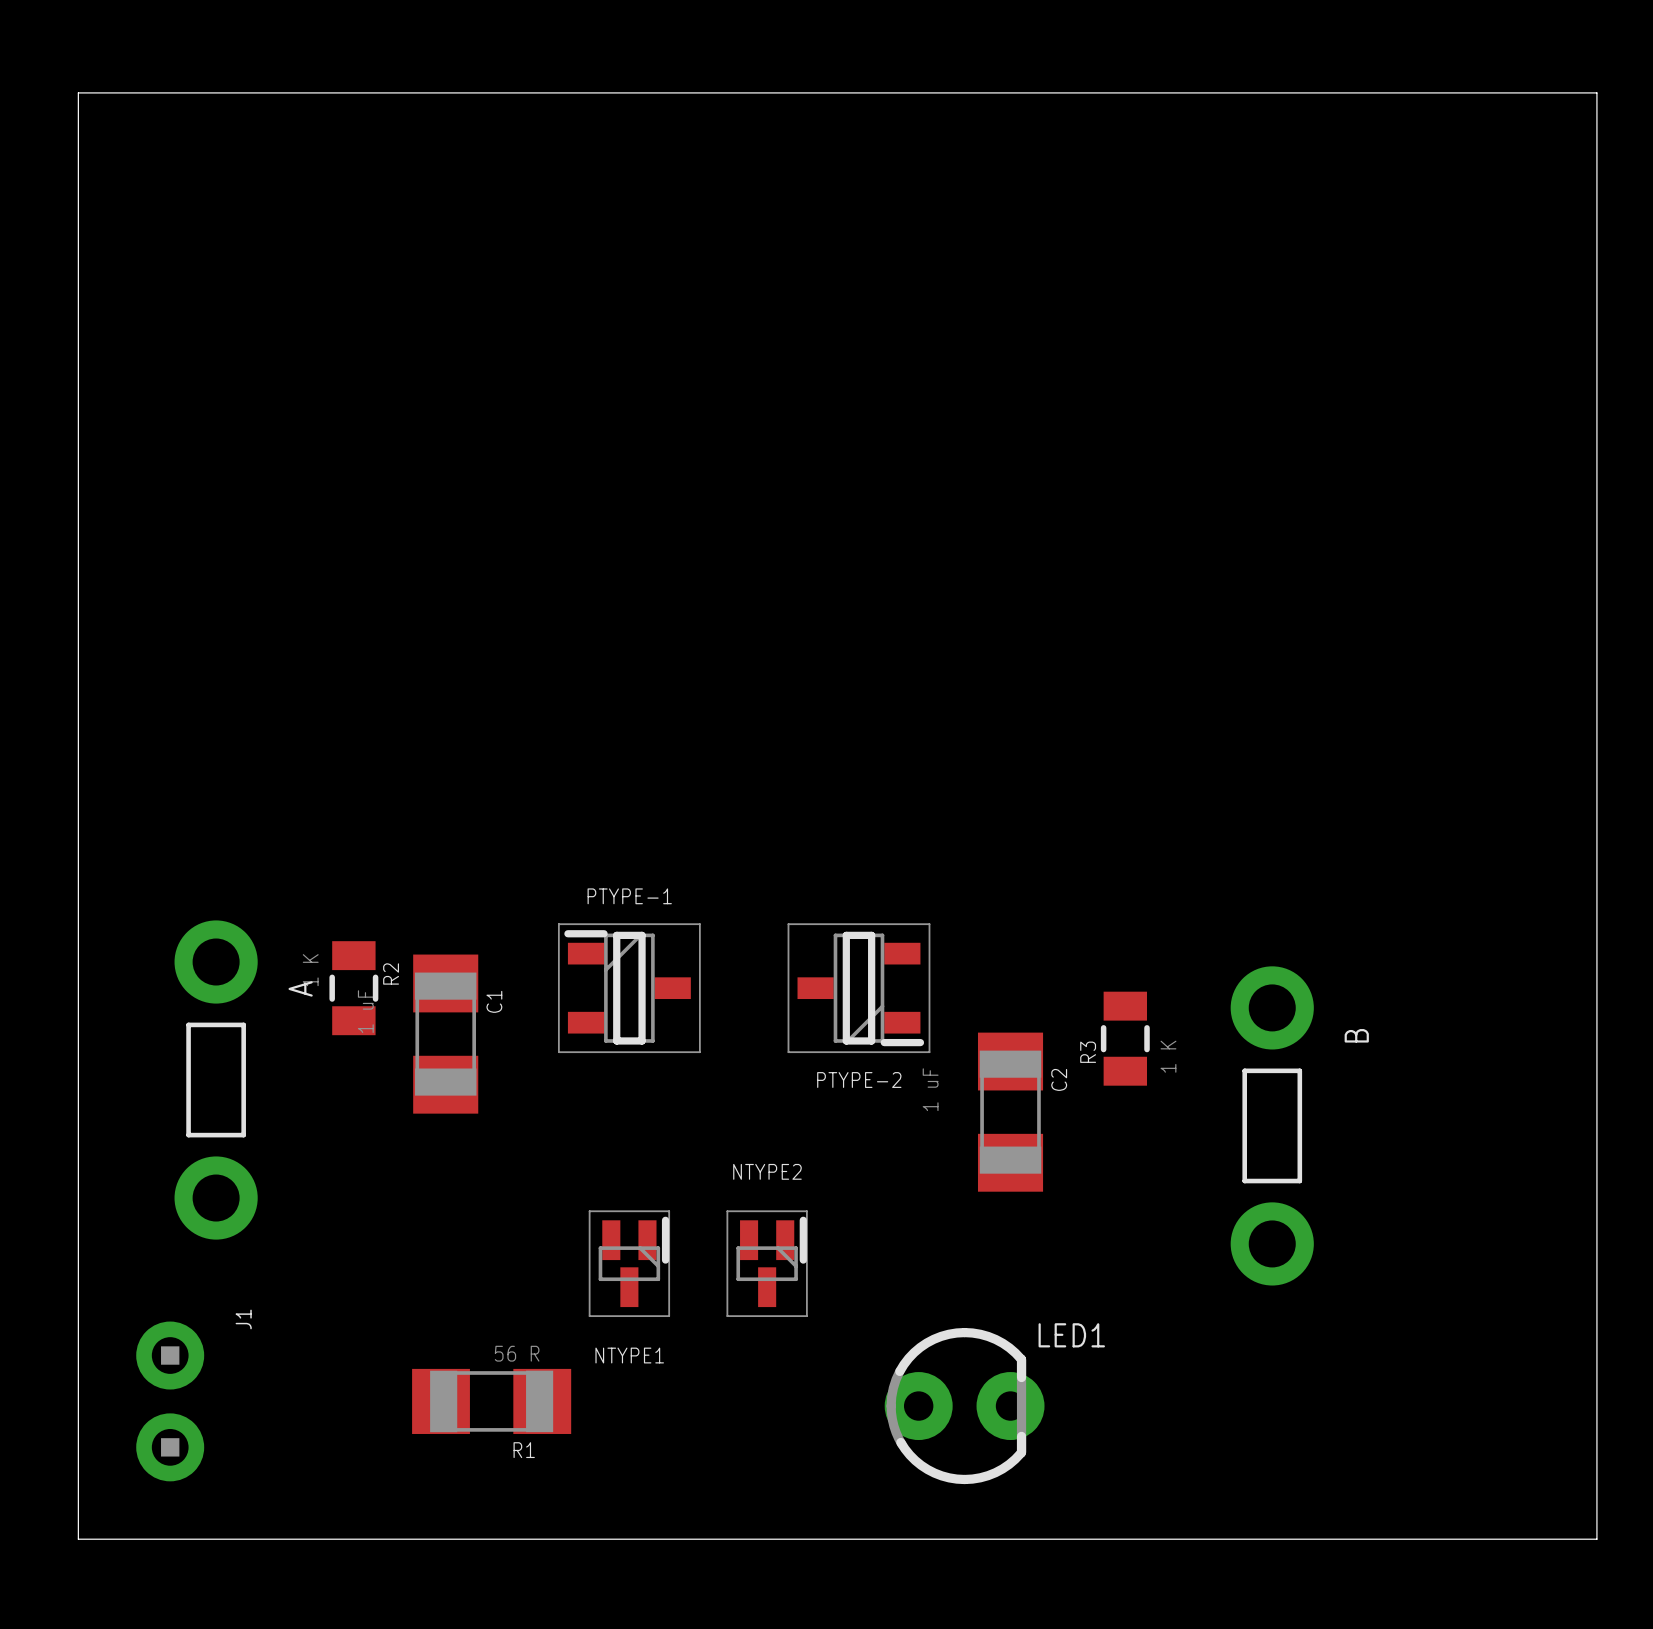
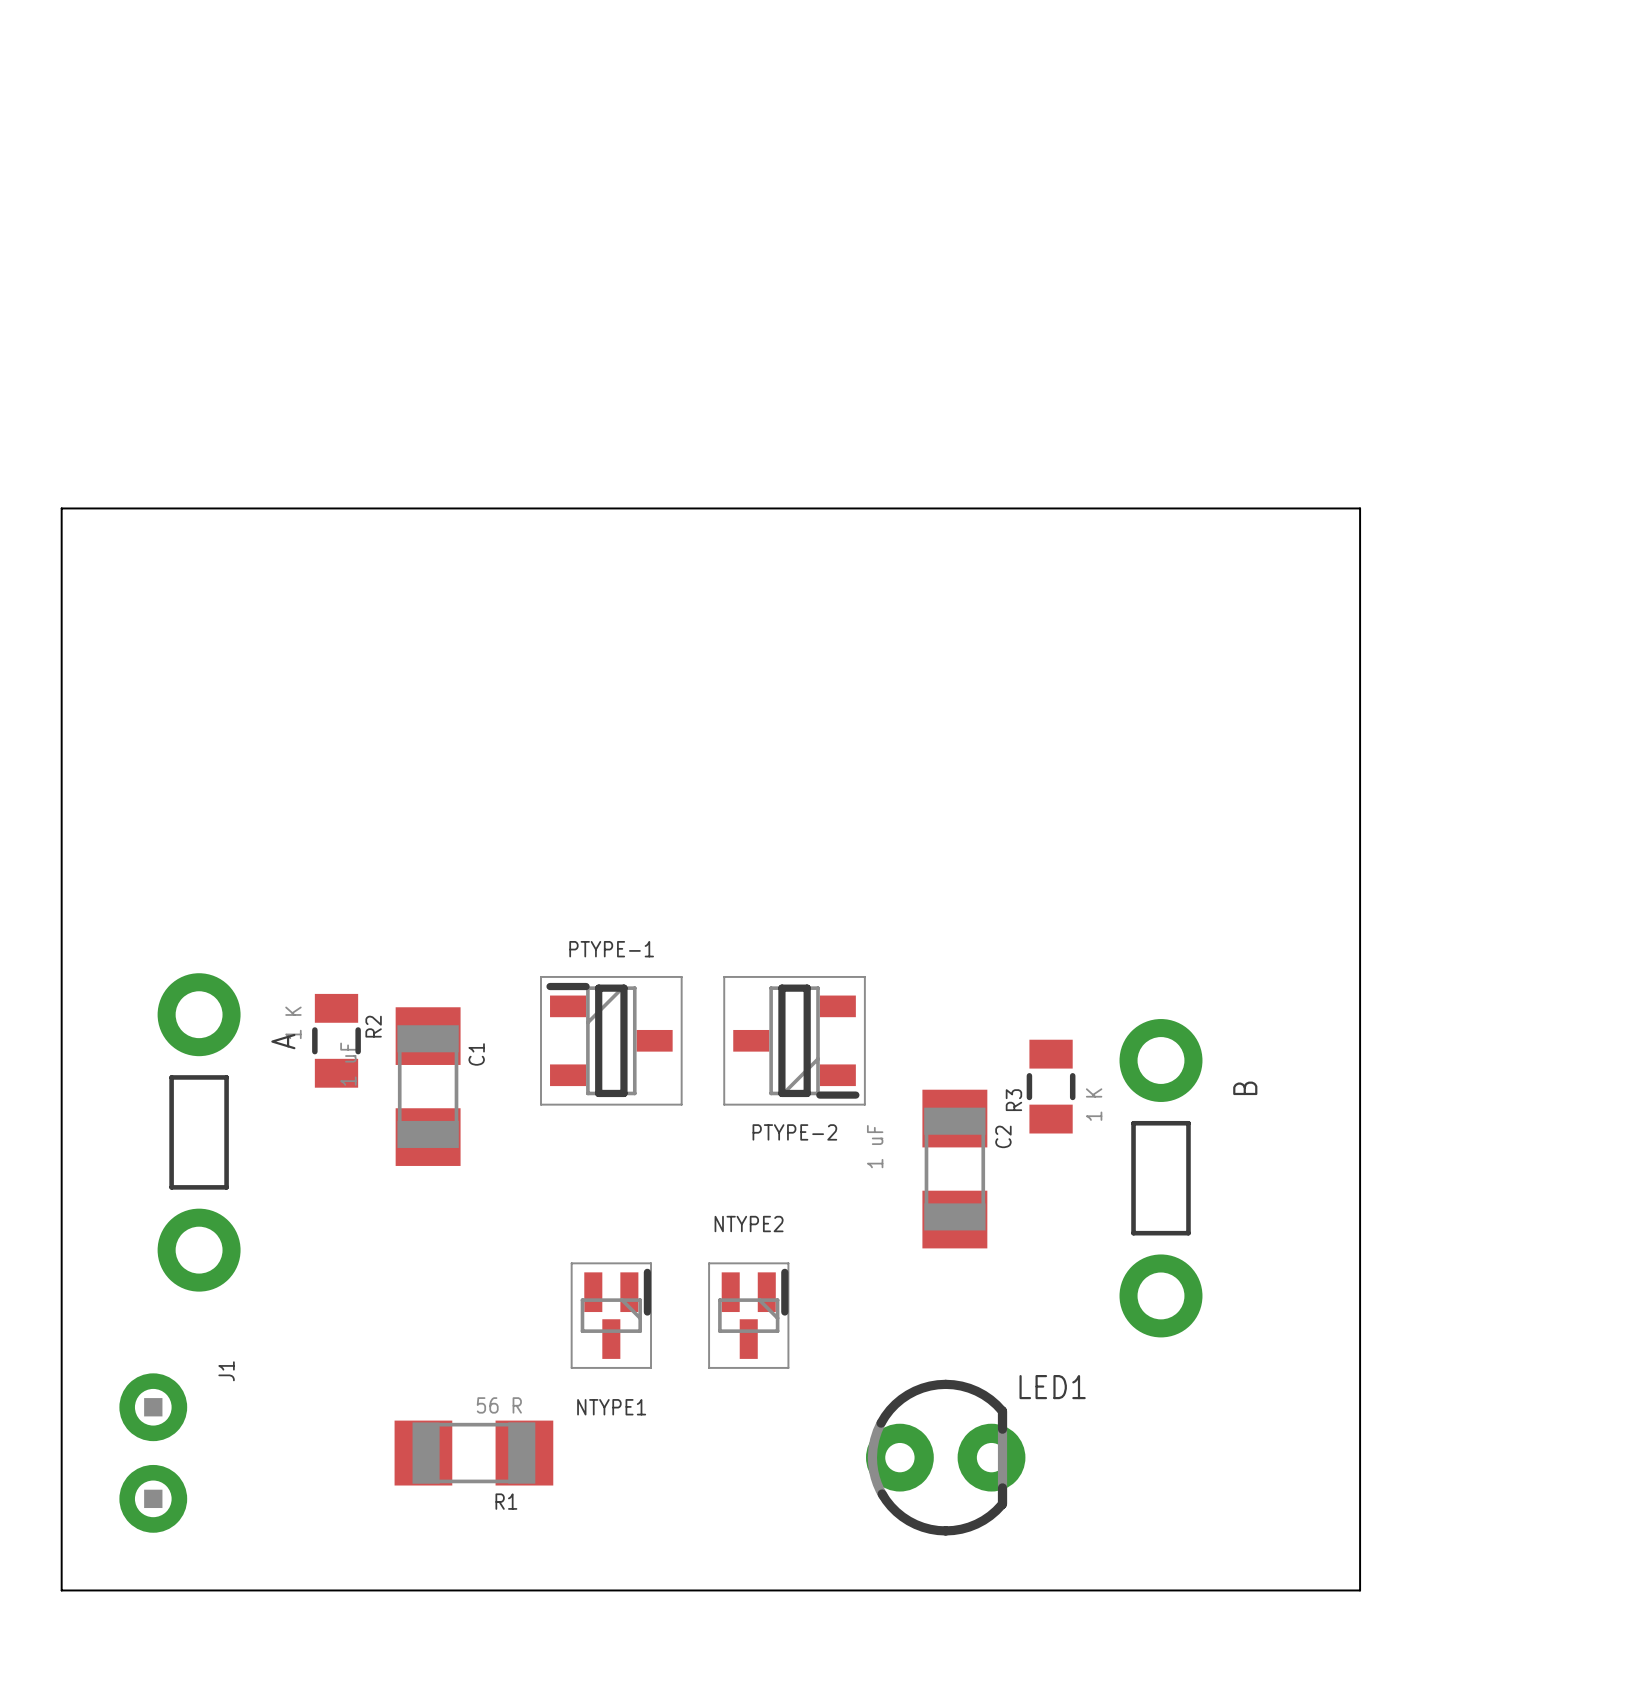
board edge: (78, 454) (78, 92) (1596, 92) (1596, 1539) (1380, 1539) -> (61, 508) (1360, 508) (1360, 1590)
PTYPE-2 position: (858, 988) -> (794, 1040)
R3 position: (1125, 1038) -> (1051, 1086)
C2 position: (1010, 1112) -> (954, 1169)
B position: (1272, 1125) -> (1160, 1178)

